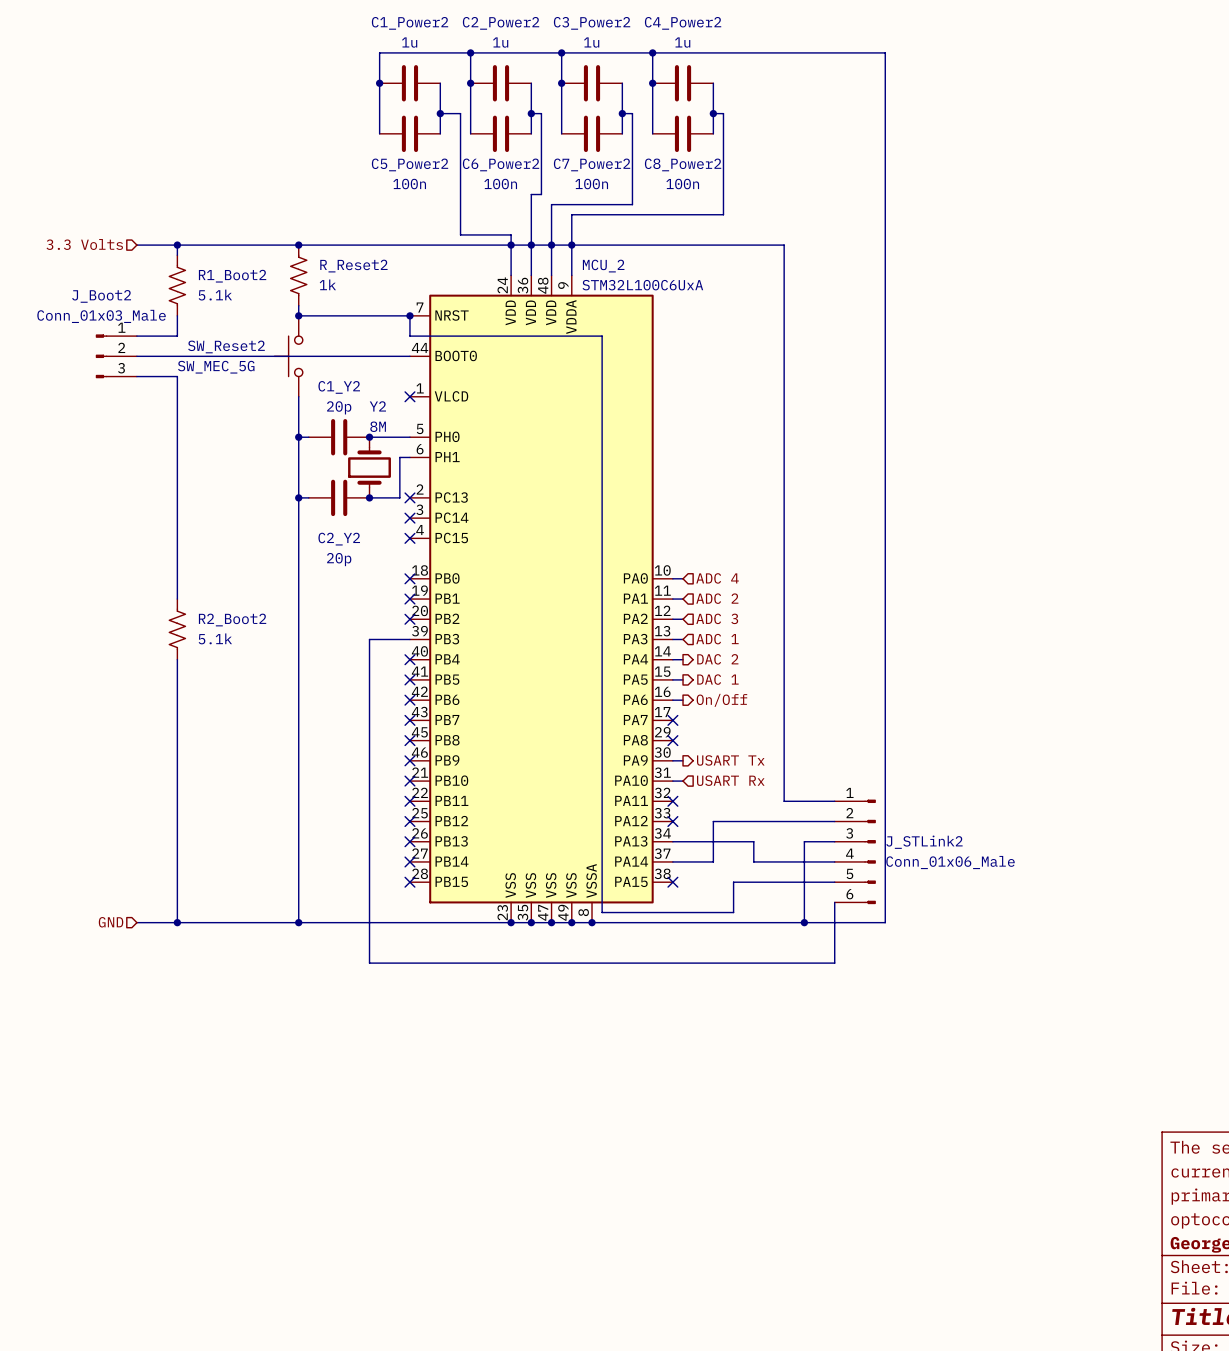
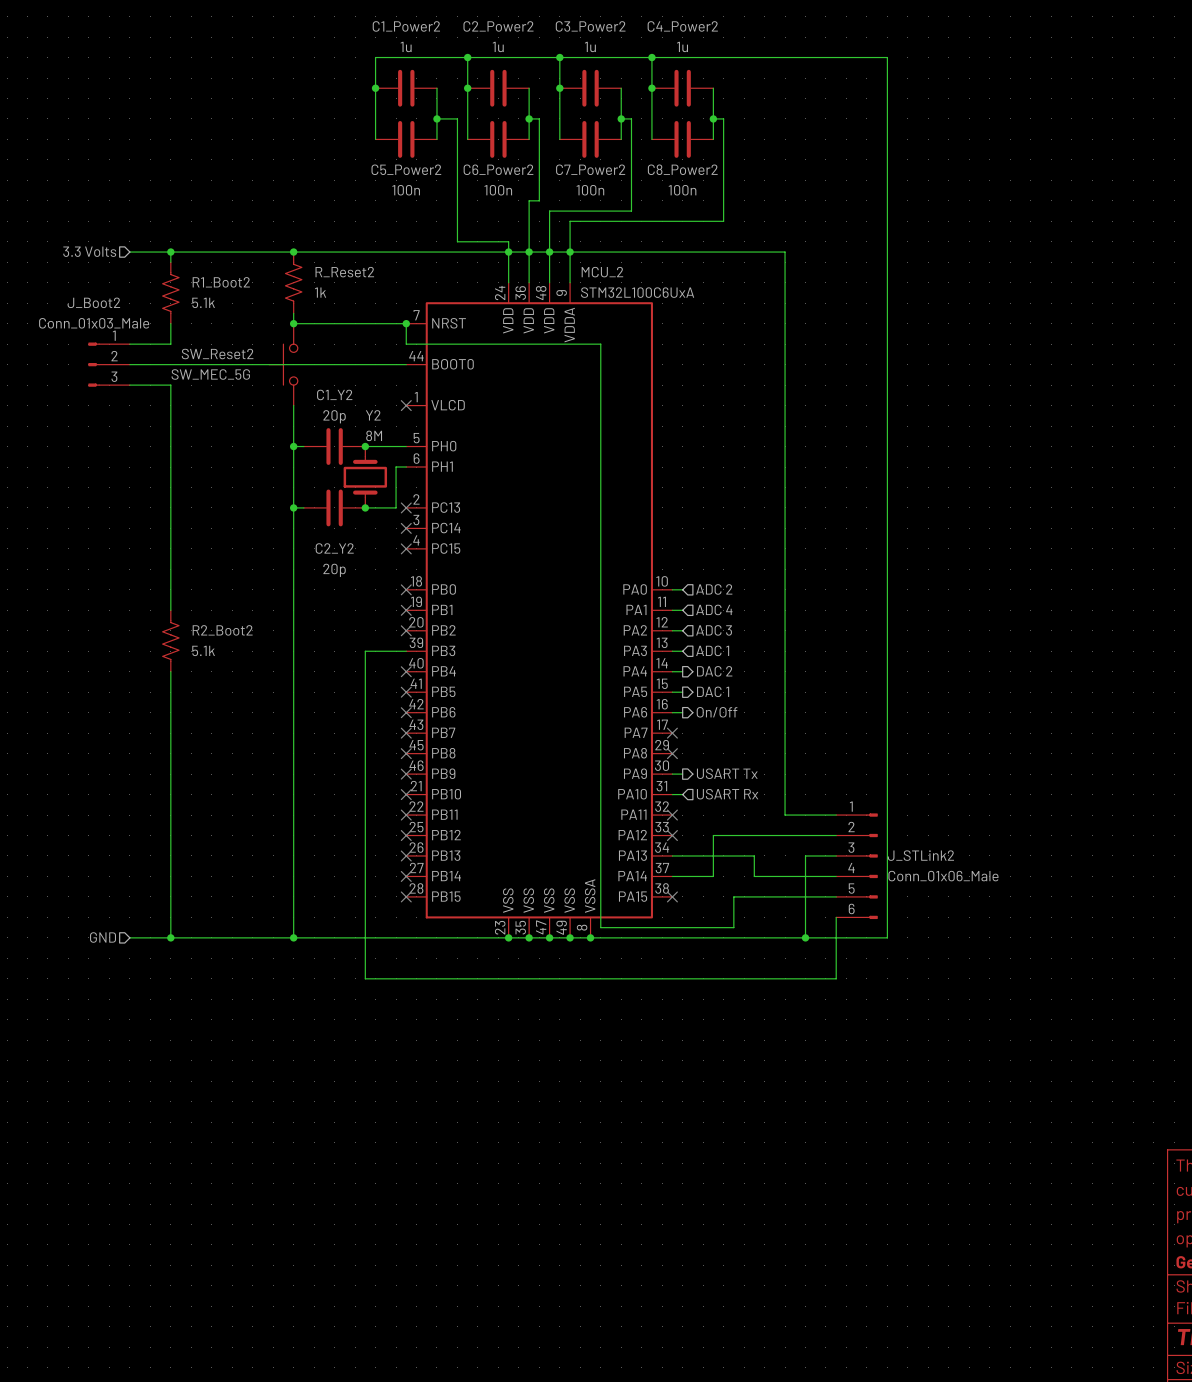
hierarchical label: ADC 4 (717, 578) -> ADC 2 (714, 589)
hierarchical label: ADC 2 (717, 598) -> ADC 4 (714, 609)

